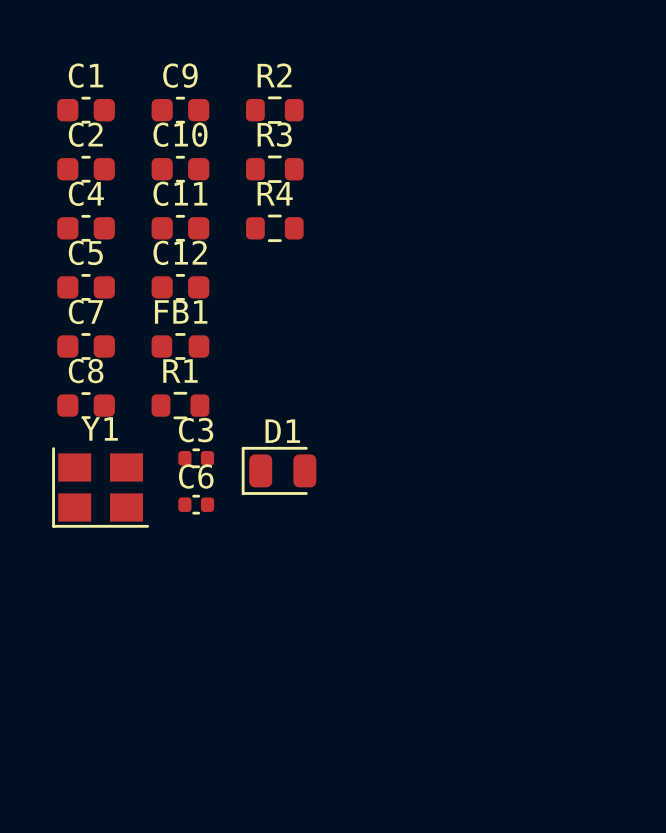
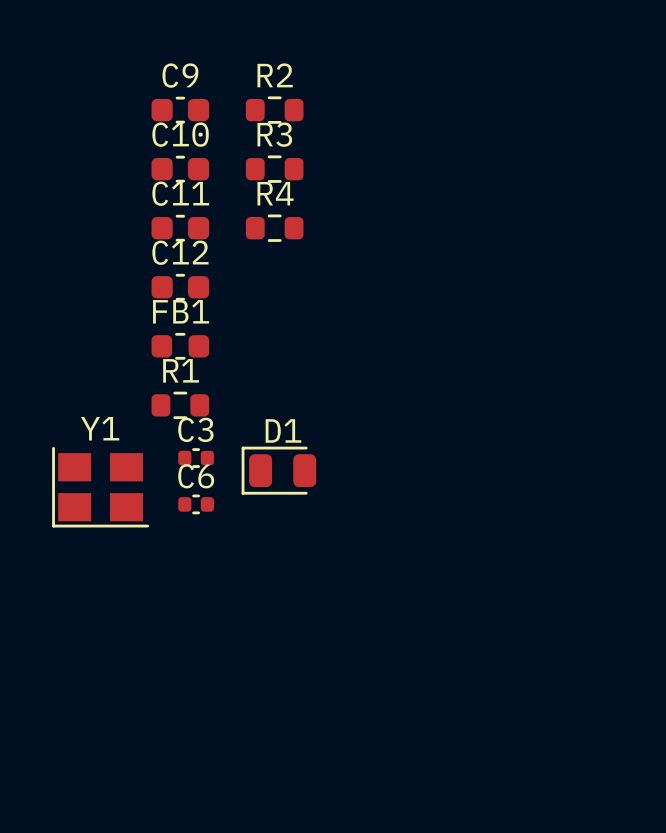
C1: (86, 110) -> none
C2: (86, 169) -> none
C4: (86, 228) -> none
C5: (86, 287) -> none
C7: (86, 346) -> none
C8: (86, 405) -> none

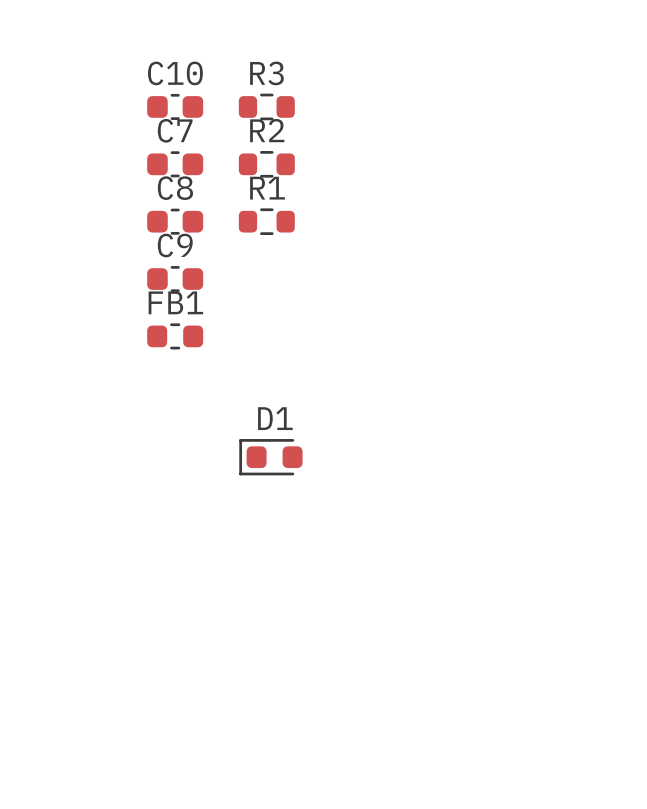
C9 name: C9 (180, 75) -> C10 (175, 73)
R2 name: R2 (275, 75) -> R3 (266, 73)
C10 name: C10 (180, 134) -> C7 (175, 130)
R3 name: R3 (274, 134) -> R2 (267, 130)
C11 name: C11 (180, 193) -> C8 (175, 188)
R4 name: R4 (275, 193) -> R1 (267, 188)
C12 name: C12 (180, 252) -> C9 (175, 245)
R1: (180, 405) -> none
D1 footprint: [241, 446, 317, 495] -> [239, 439, 303, 476]
C3: (196, 458) -> none
Y1: (100, 487) -> none
C6: (196, 504) -> none

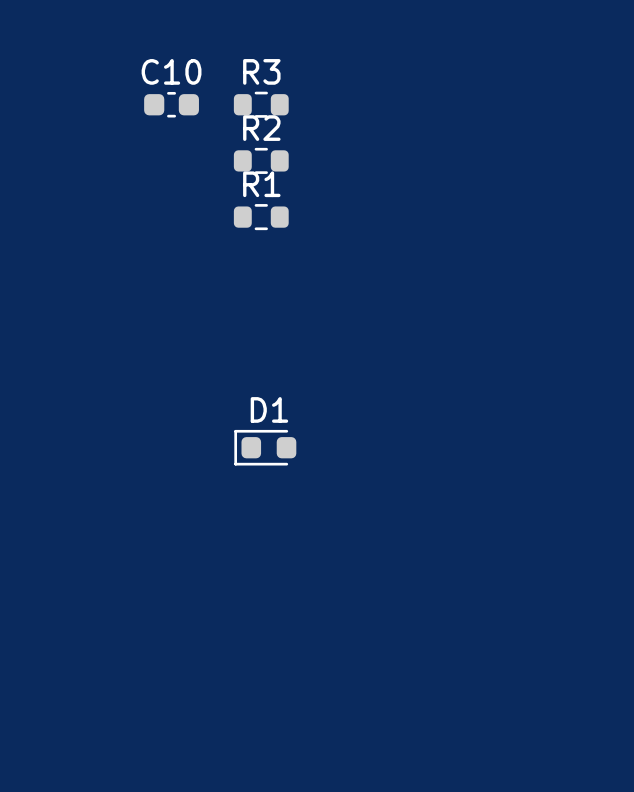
C7: (175, 164) -> none
C8: (175, 221) -> none
C9: (175, 279) -> none
FB1: (175, 336) -> none

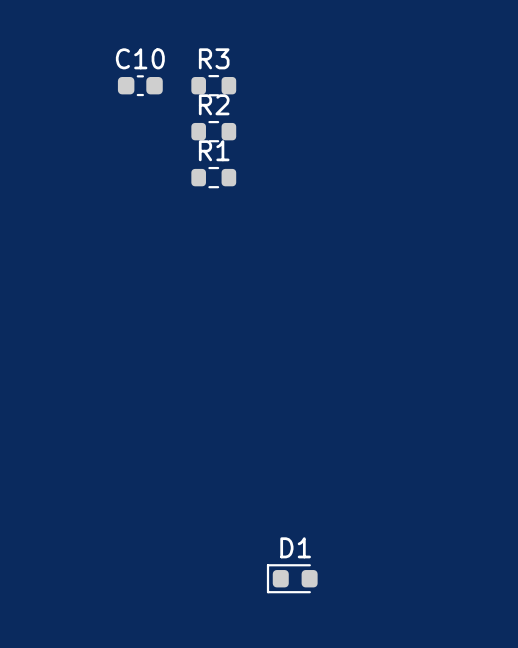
D1 position: (265, 447) -> (292, 578)

